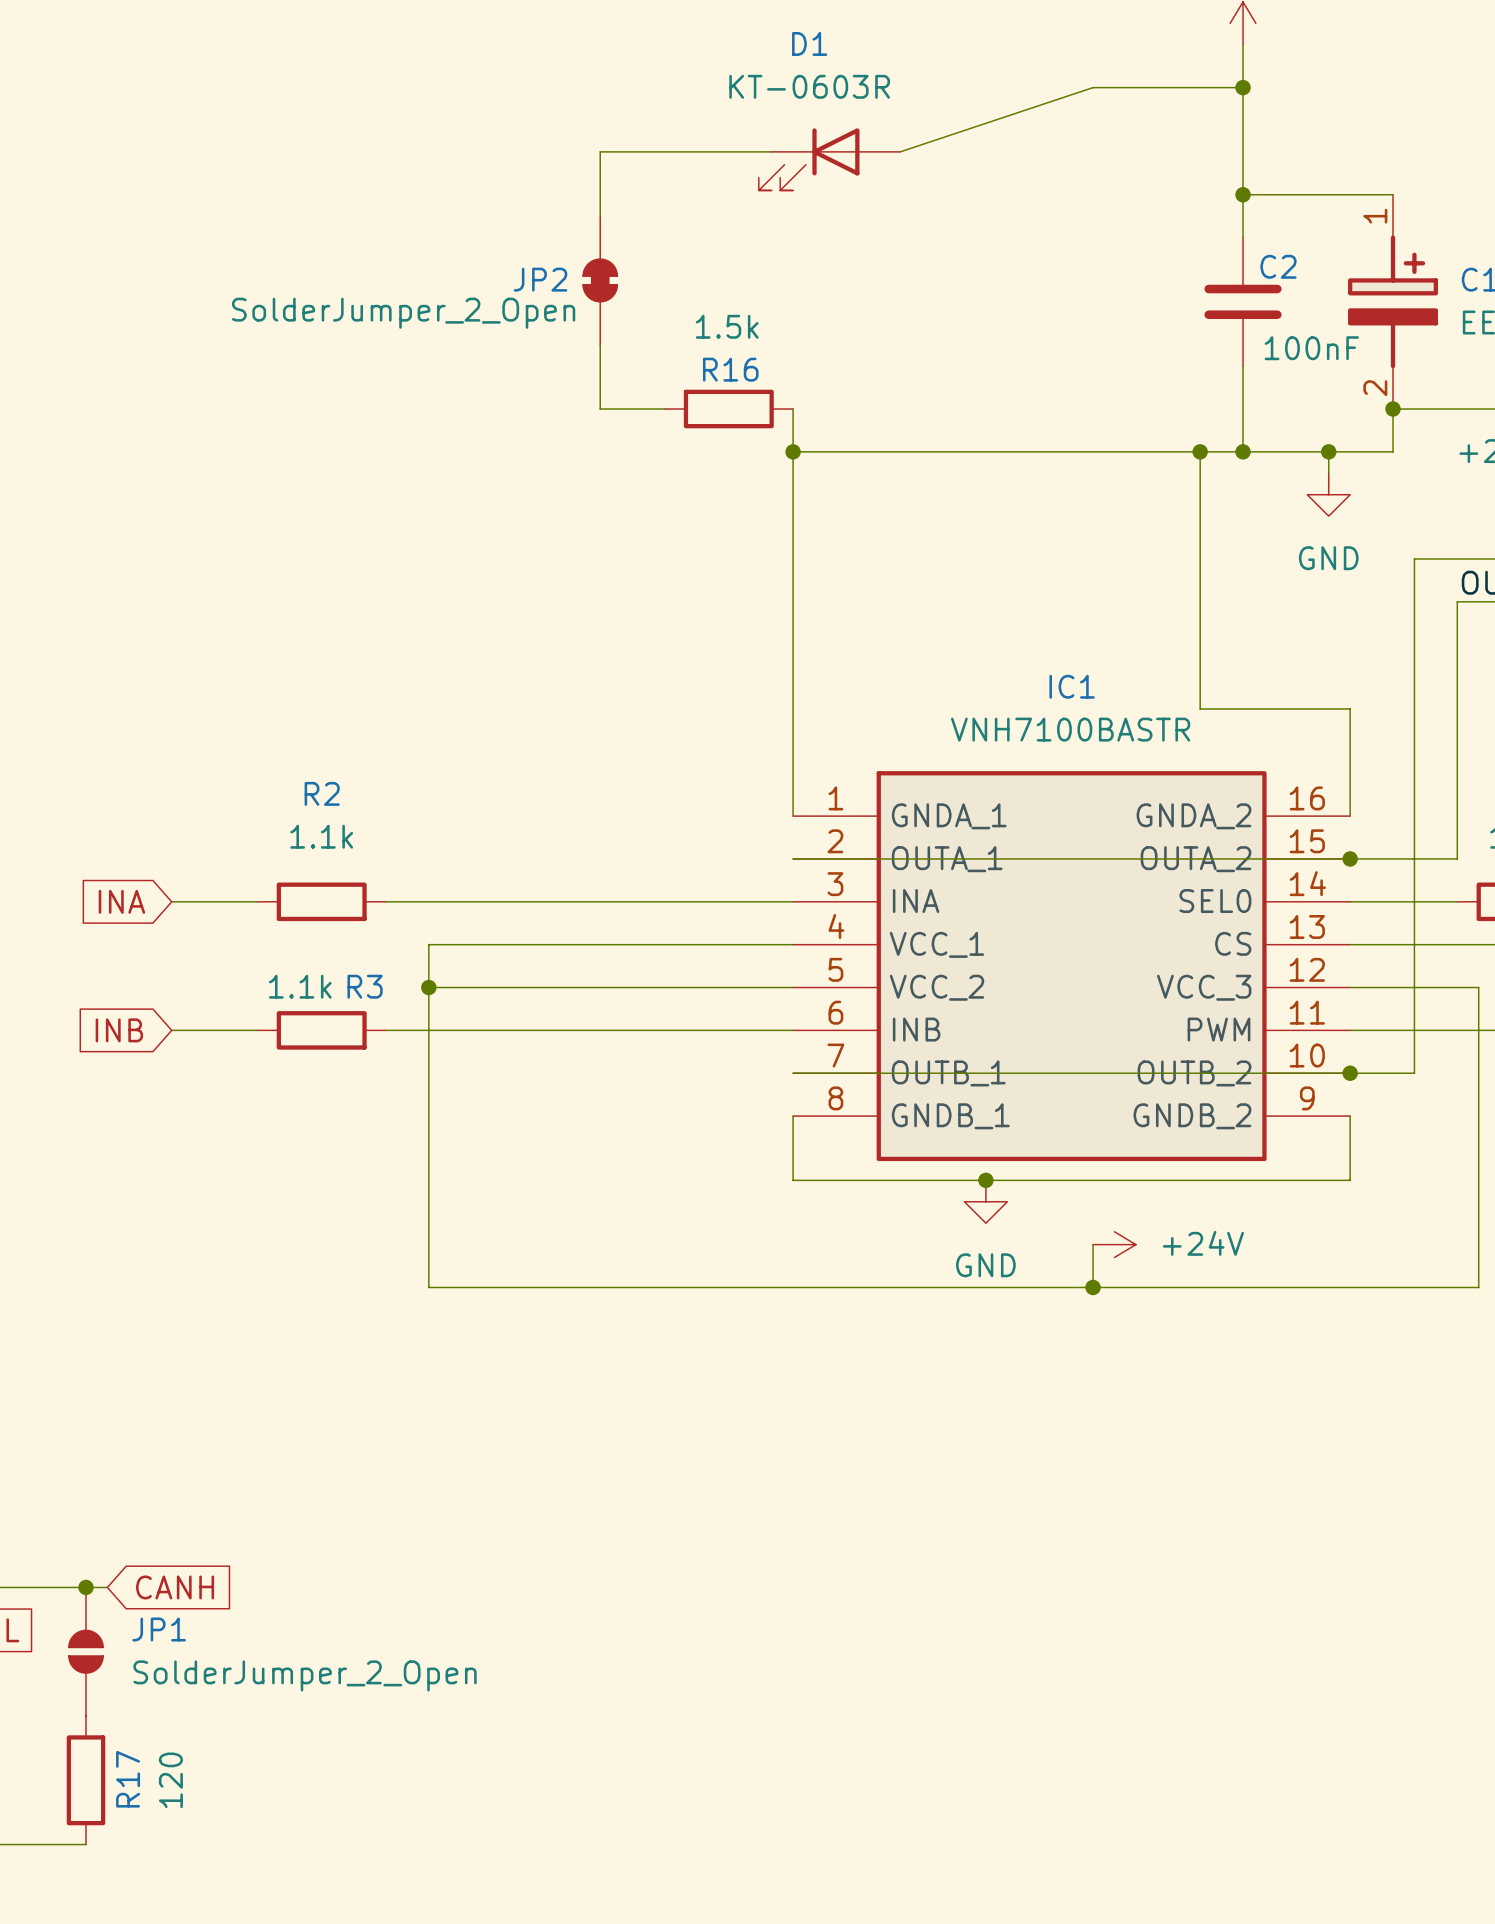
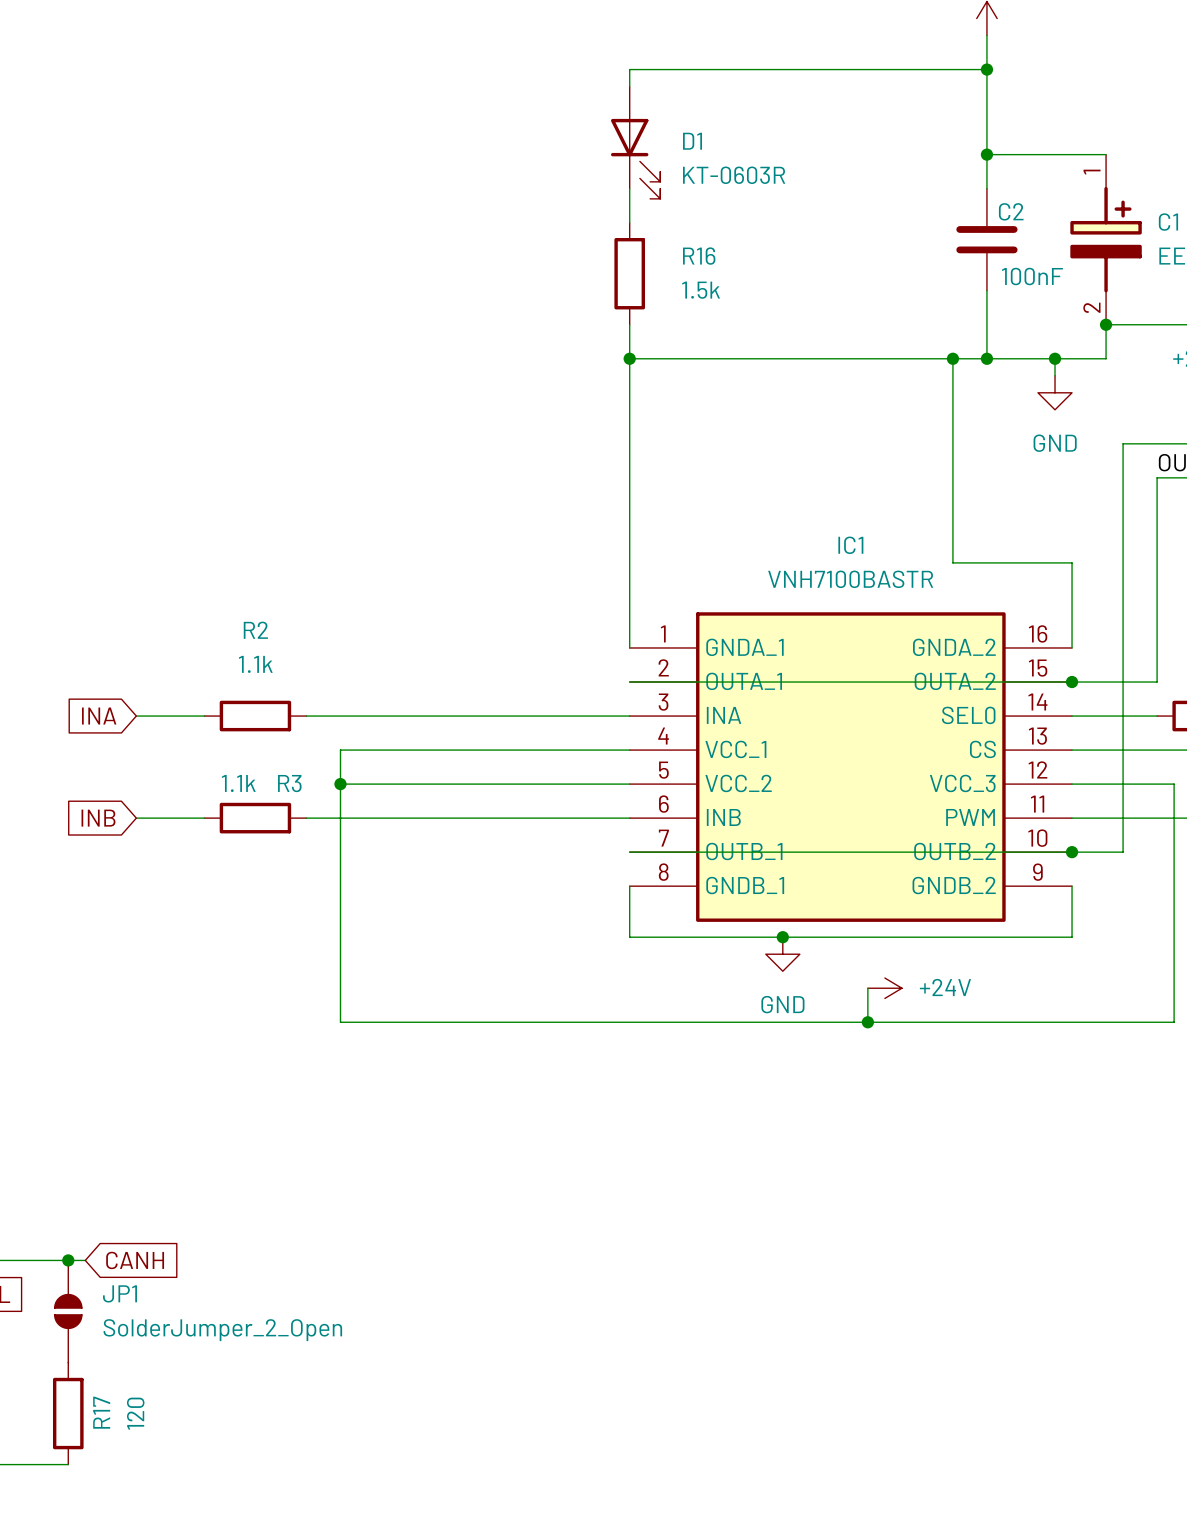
D1 name position: D1 (809, 43) -> D1 (692, 141)
D1 value position: KT-0603R (809, 86) -> KT-0603R (734, 175)
wire: (1093, 87) (900, 151) -> (867, 69) (629, 69) (629, 86)
wire: (771, 151) (600, 151) (600, 216) -> none
D1 rotation: 0° (809, 159) -> 90° counterclockwise (635, 158)
wire: none -> (629, 188) (629, 222)
JP2: SolderJumper_2_Open (600, 280) -> none
R16 value position: 1.5k (727, 326) -> 1.5k (701, 290)
wire: (600, 344) (600, 409) (664, 409) -> none
R16 name position: R16 (730, 369) -> R16 (699, 256)
R16 rotation: 0° (728, 409) -> 90° clockwise (629, 273)
R16 position: (728, 409) -> (629, 273)

